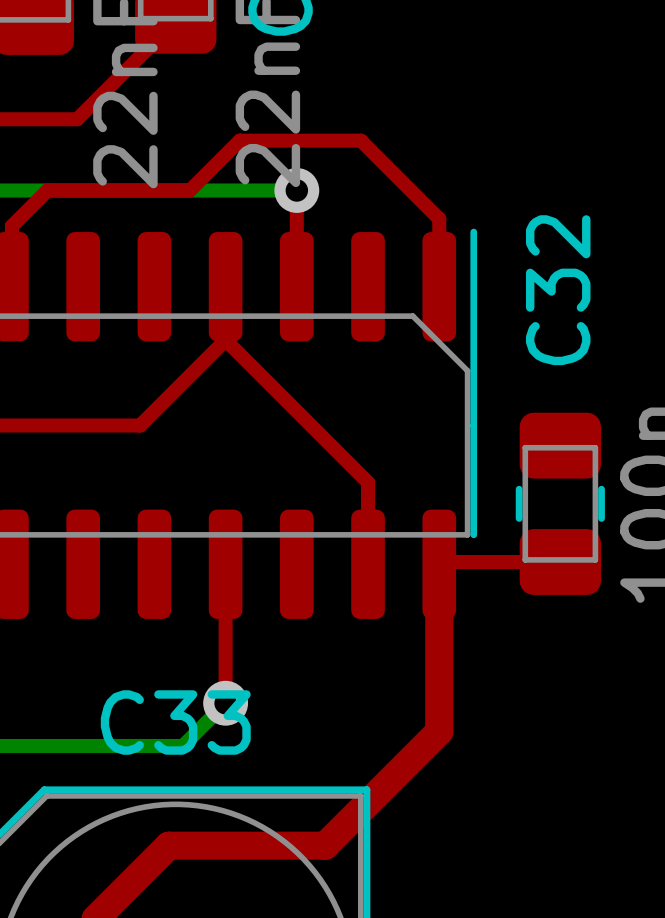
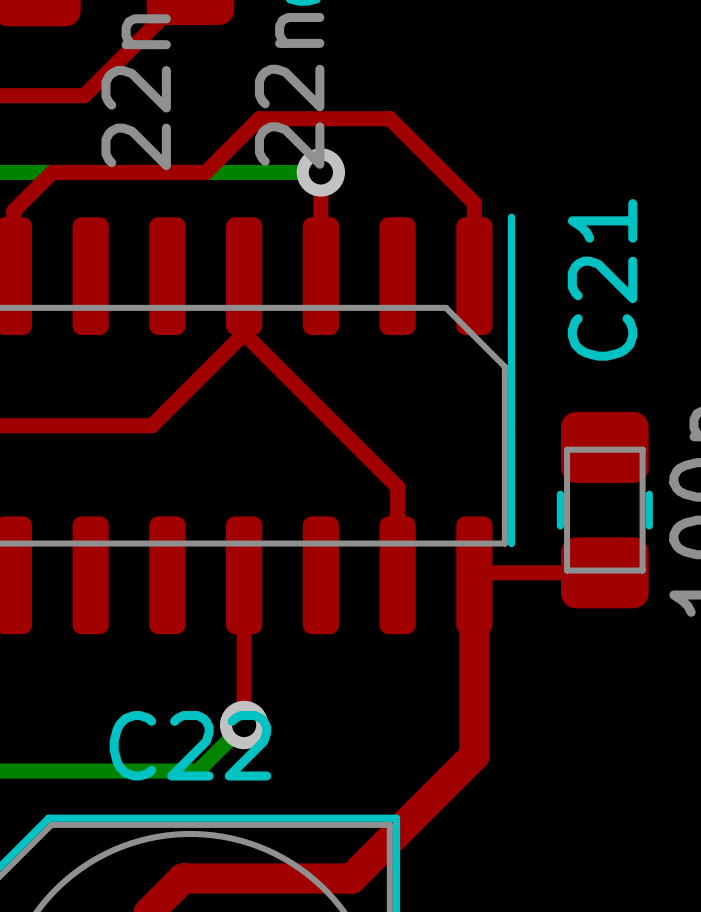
C32 name: C32 (558, 290) -> C21 (602, 279)
C33 name: C33 (175, 722) -> C22 (190, 745)

